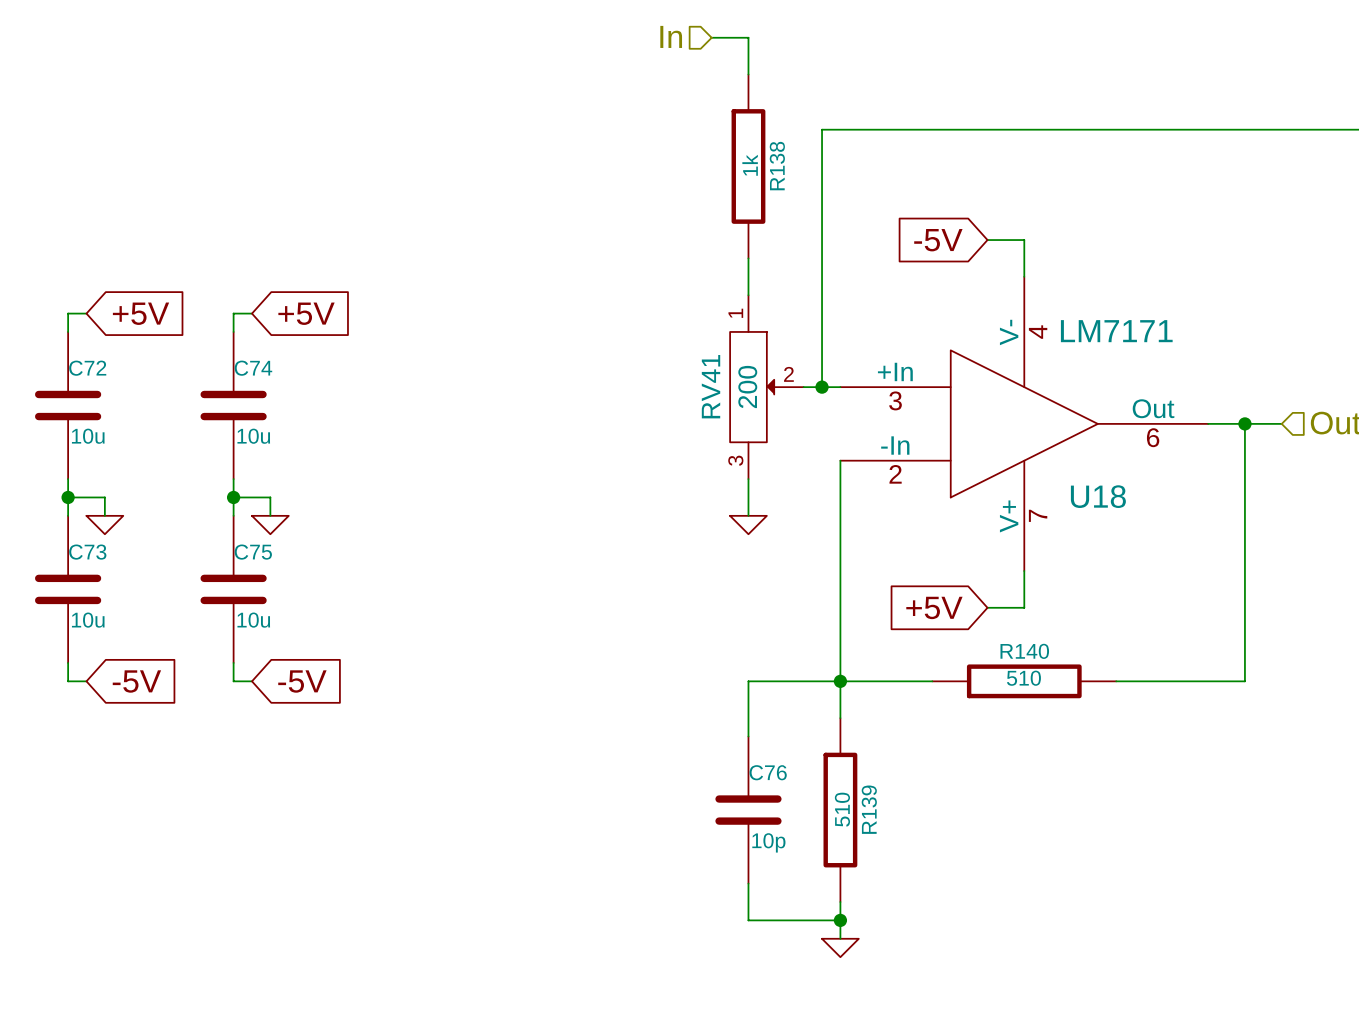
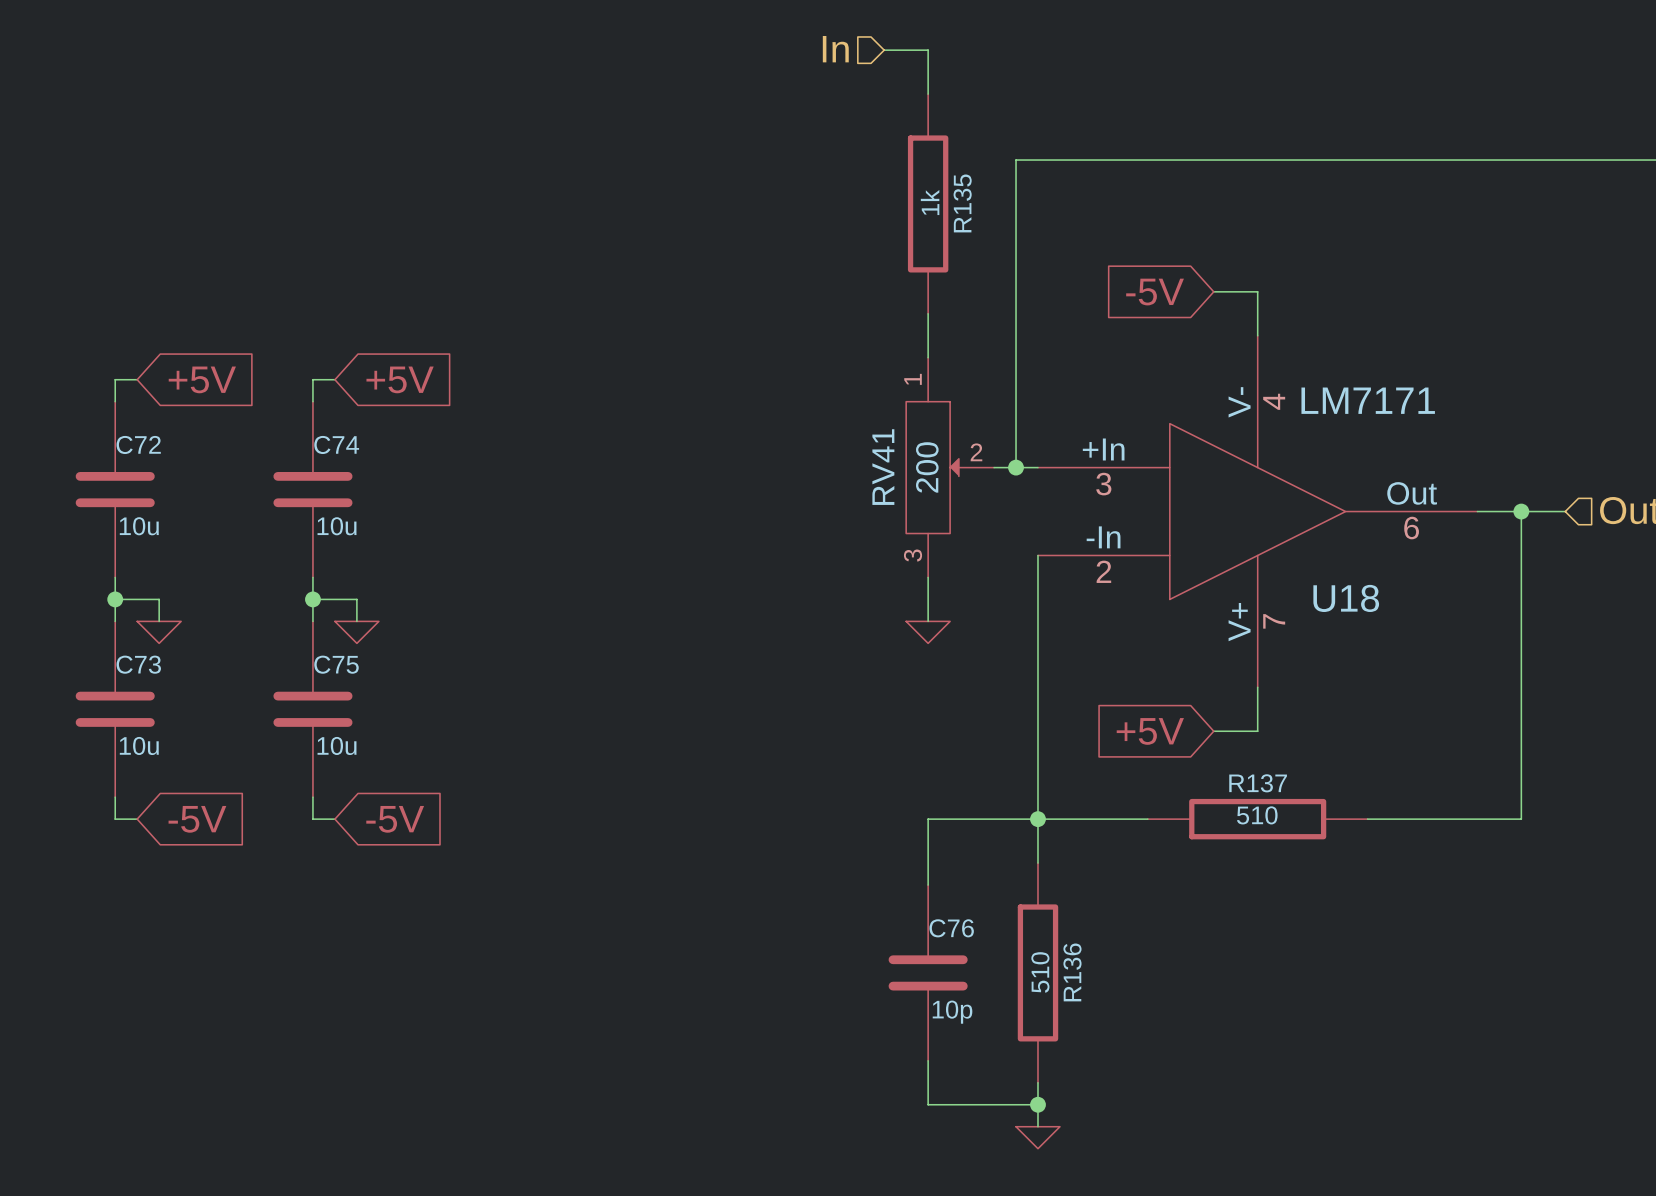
R138 name: R138 (777, 166) -> R135 (962, 203)
R140 name: R140 (1024, 651) -> R137 (1258, 783)
R139 name: R139 (869, 809) -> R136 (1072, 972)

